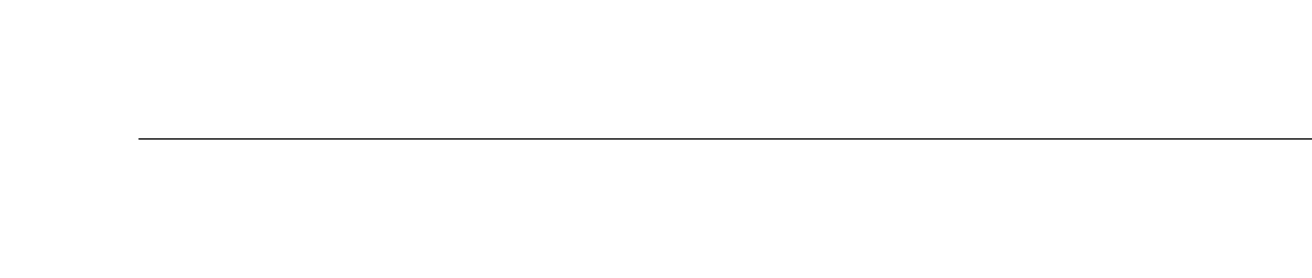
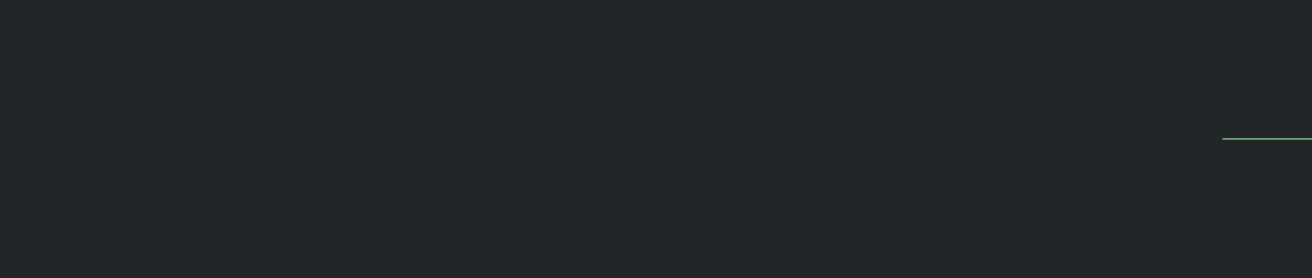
wire: (138, 138) (1222, 138) -> none

